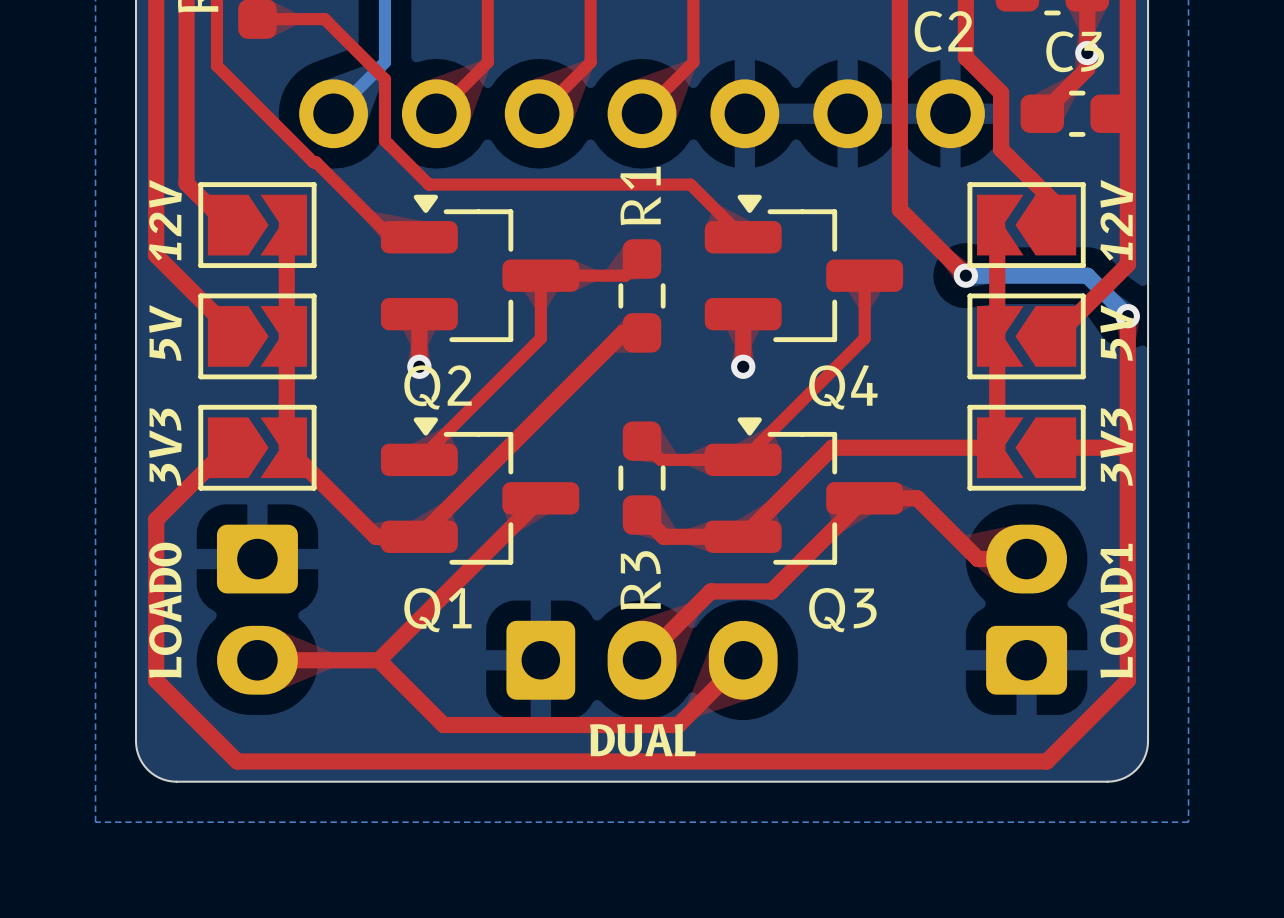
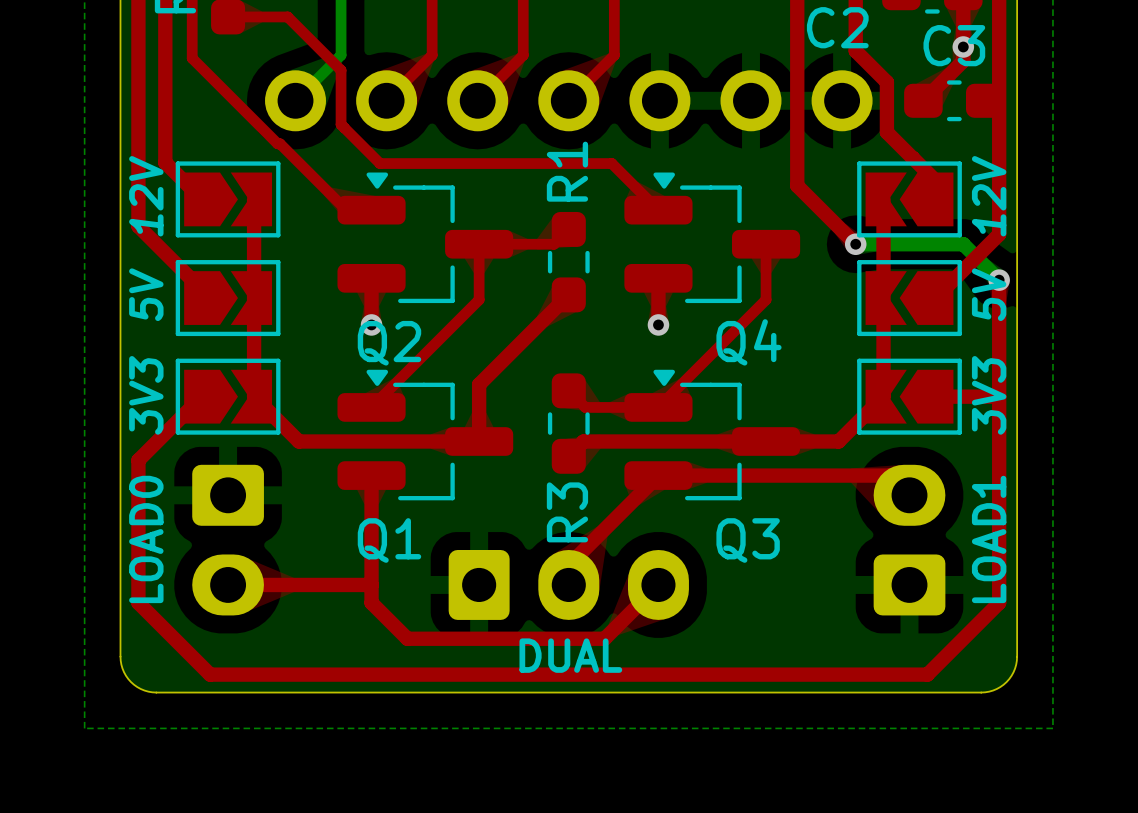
top track: (642, 332) (623, 332) (419, 536) (375, 536) (337, 498) -> (568, 294) (479, 384) (479, 441) (298, 441)
top track: (997, 447) (832, 447) (743, 536) (663, 536) (642, 515) -> (766, 441) (583, 441) (568, 456)
top track: (540, 498) (378, 660) (443, 725) (678, 725) (682, 720) -> (371, 475) (371, 602) (407, 638) (604, 638)
top track: (864, 498) (771, 591) (710, 591) (642, 660) -> none
top track: (917, 498) (978, 559) (1026, 559) -> (812, 441) (838, 441) (883, 396)
top track: none -> (909, 495) (889, 475) (658, 475) (568, 565)
top track: none -> (335, 584) (371, 584)

